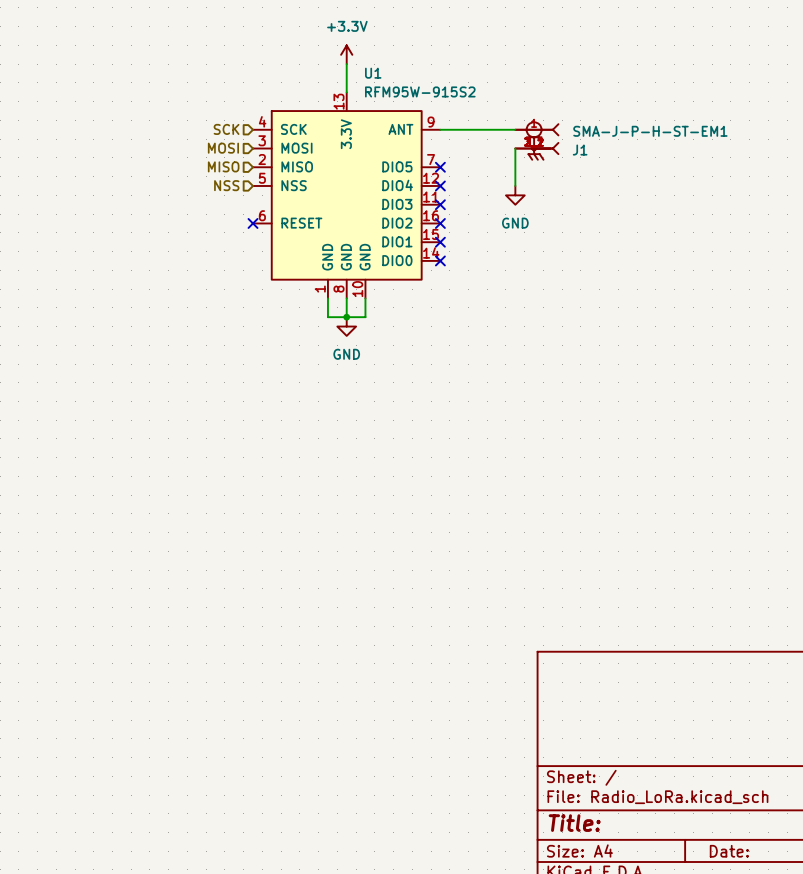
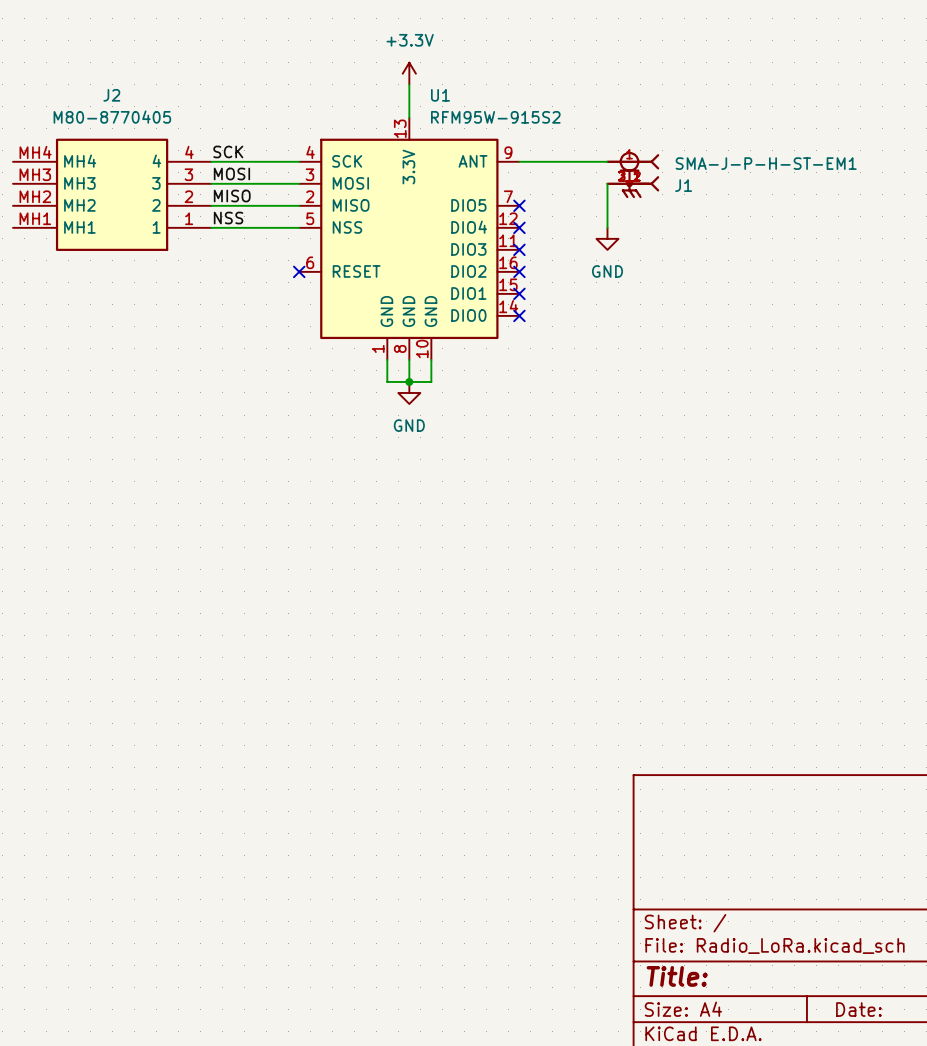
label: none -> SCK (228, 151)
wire: none -> (211, 161) (299, 161)
hierarchical label: SCK (226, 129) -> none
label: none -> MOSI (231, 173)
wire: none -> (211, 183) (299, 183)
hierarchical label: MOSI (223, 148) -> none
J2: none -> M80-8770405 (112, 194)
label: none -> MISO (232, 196)
hierarchical label: MISO (223, 166) -> none
wire: none -> (211, 205) (299, 205)
label: none -> NSS (228, 218)
wire: none -> (211, 227) (299, 227)
hierarchical label: NSS (226, 185) -> none

